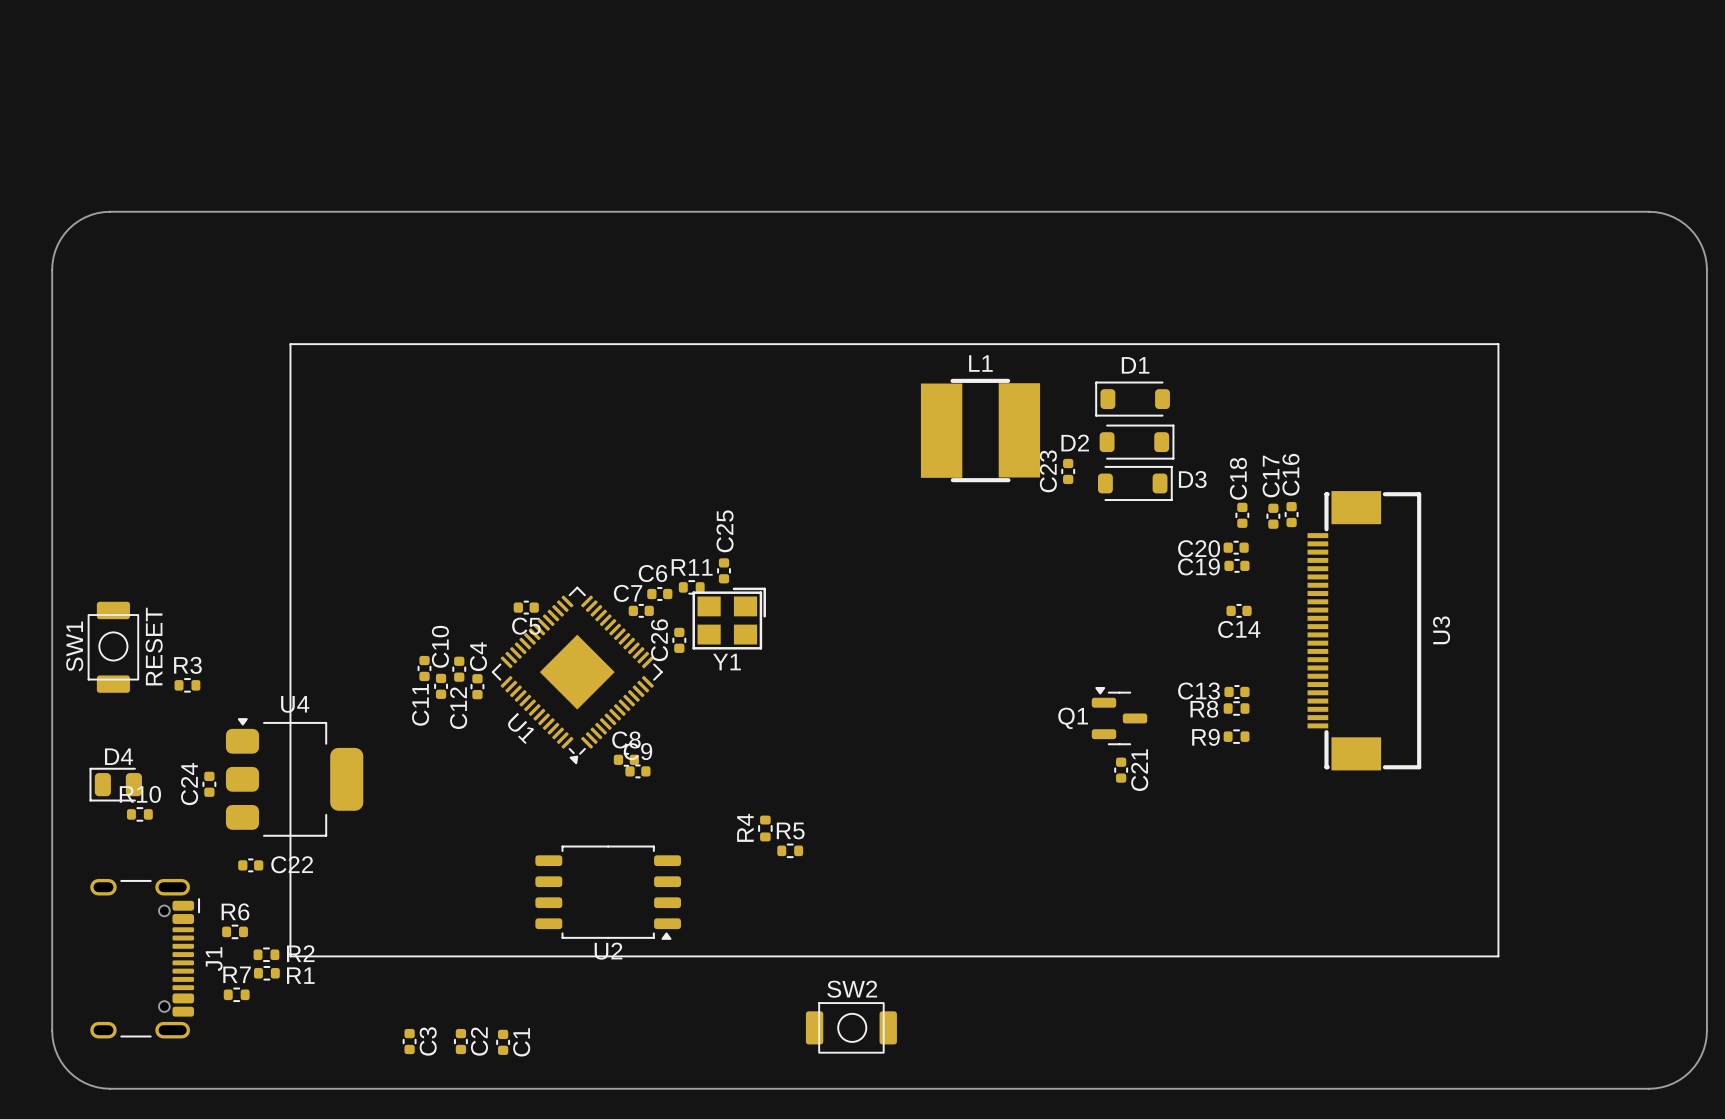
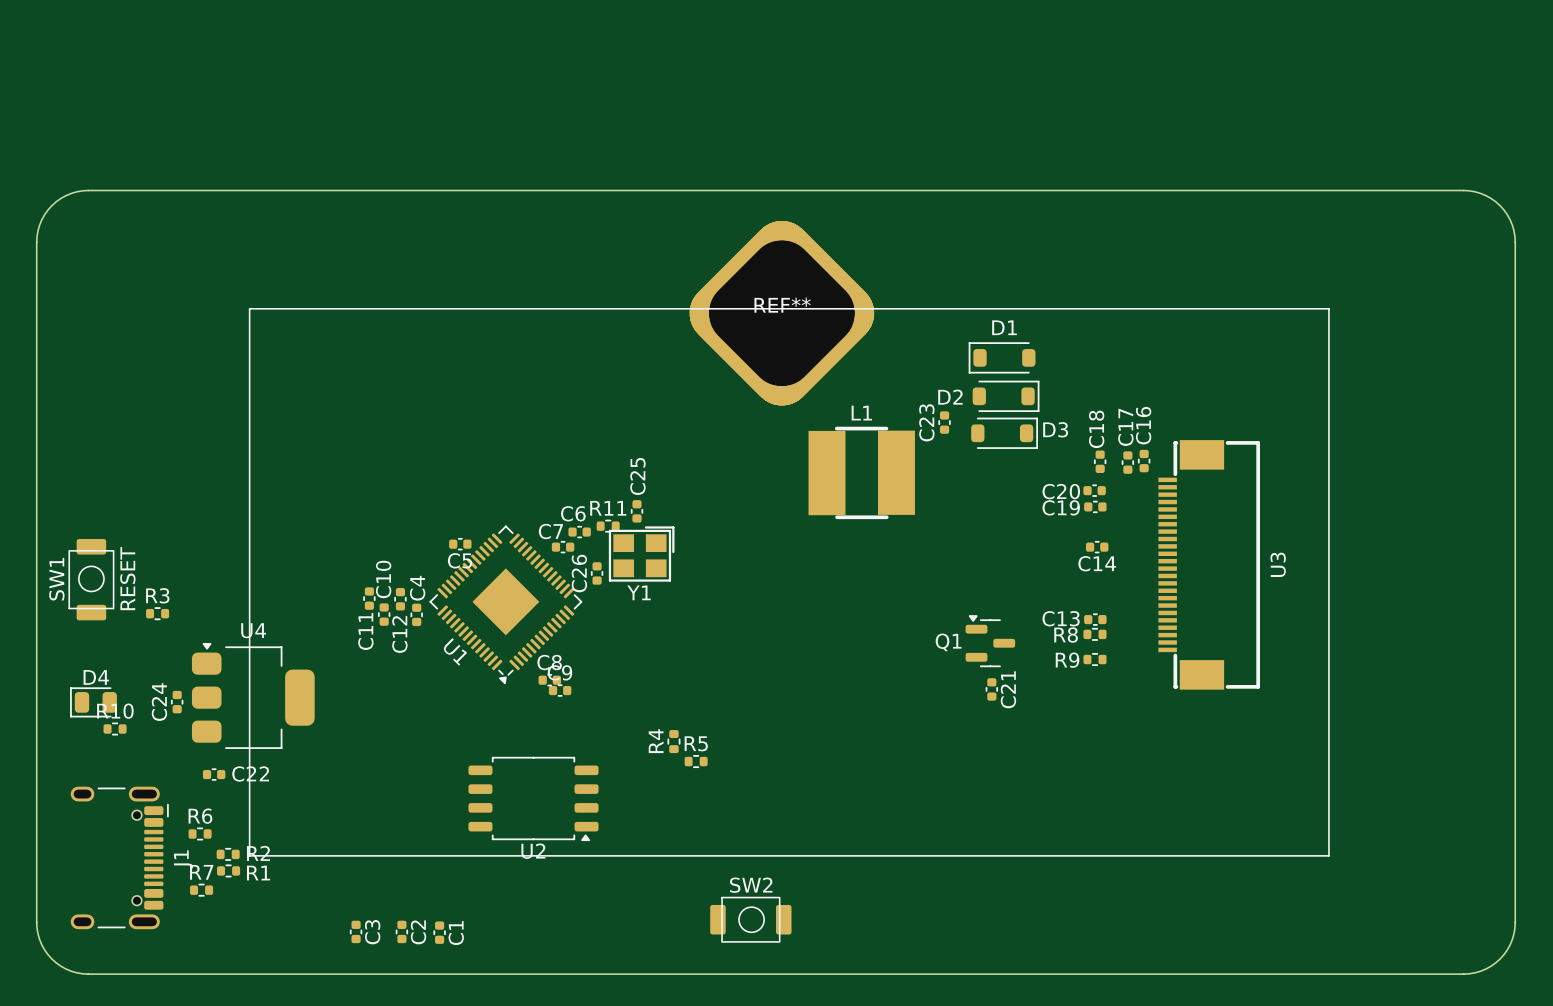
REF**: none -> (781, 313)
L1 position: (980, 430) -> (861, 472)

